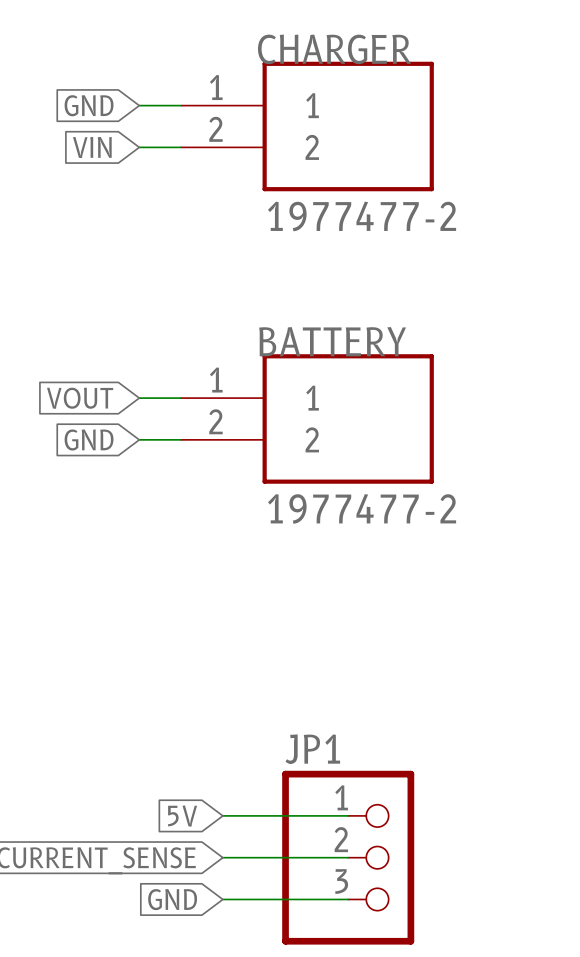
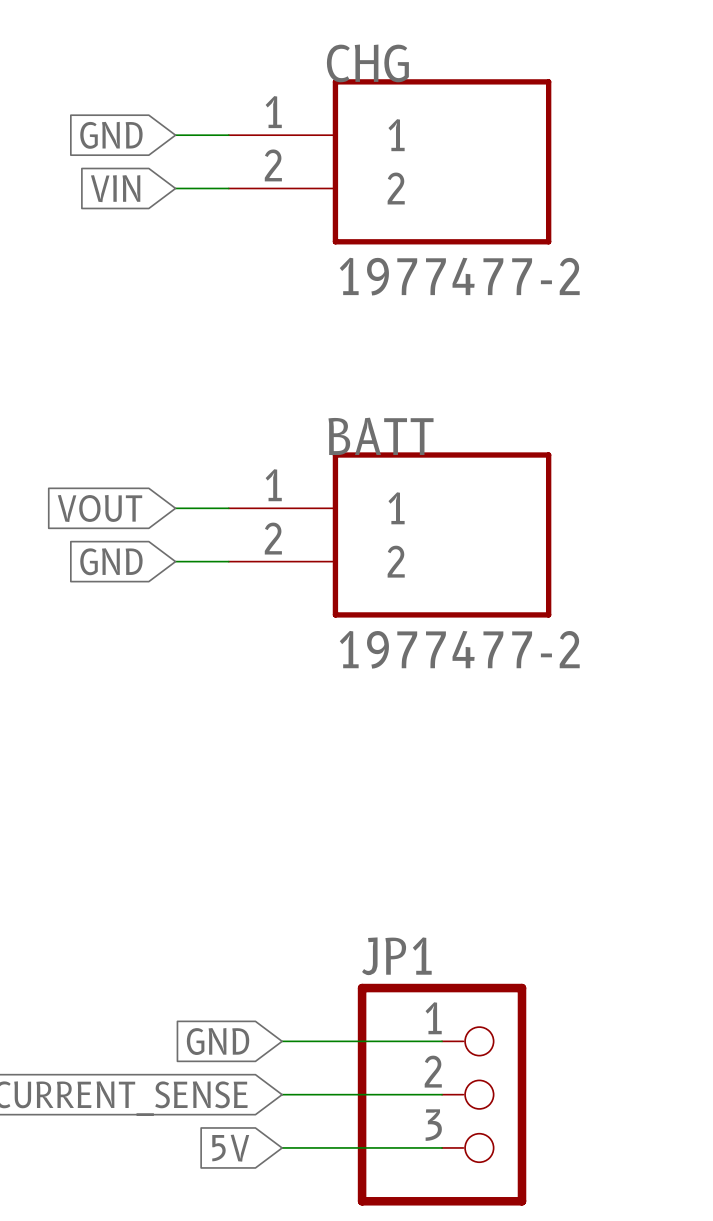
CHARGER name: CHARGER (334, 49) -> CHG (367, 63)
BATTERY name: BATTERY (332, 341) -> BATT (381, 436)
global label: 5V (182, 816) -> GND (218, 1041)
global label: GND (172, 899) -> 5V (230, 1148)

